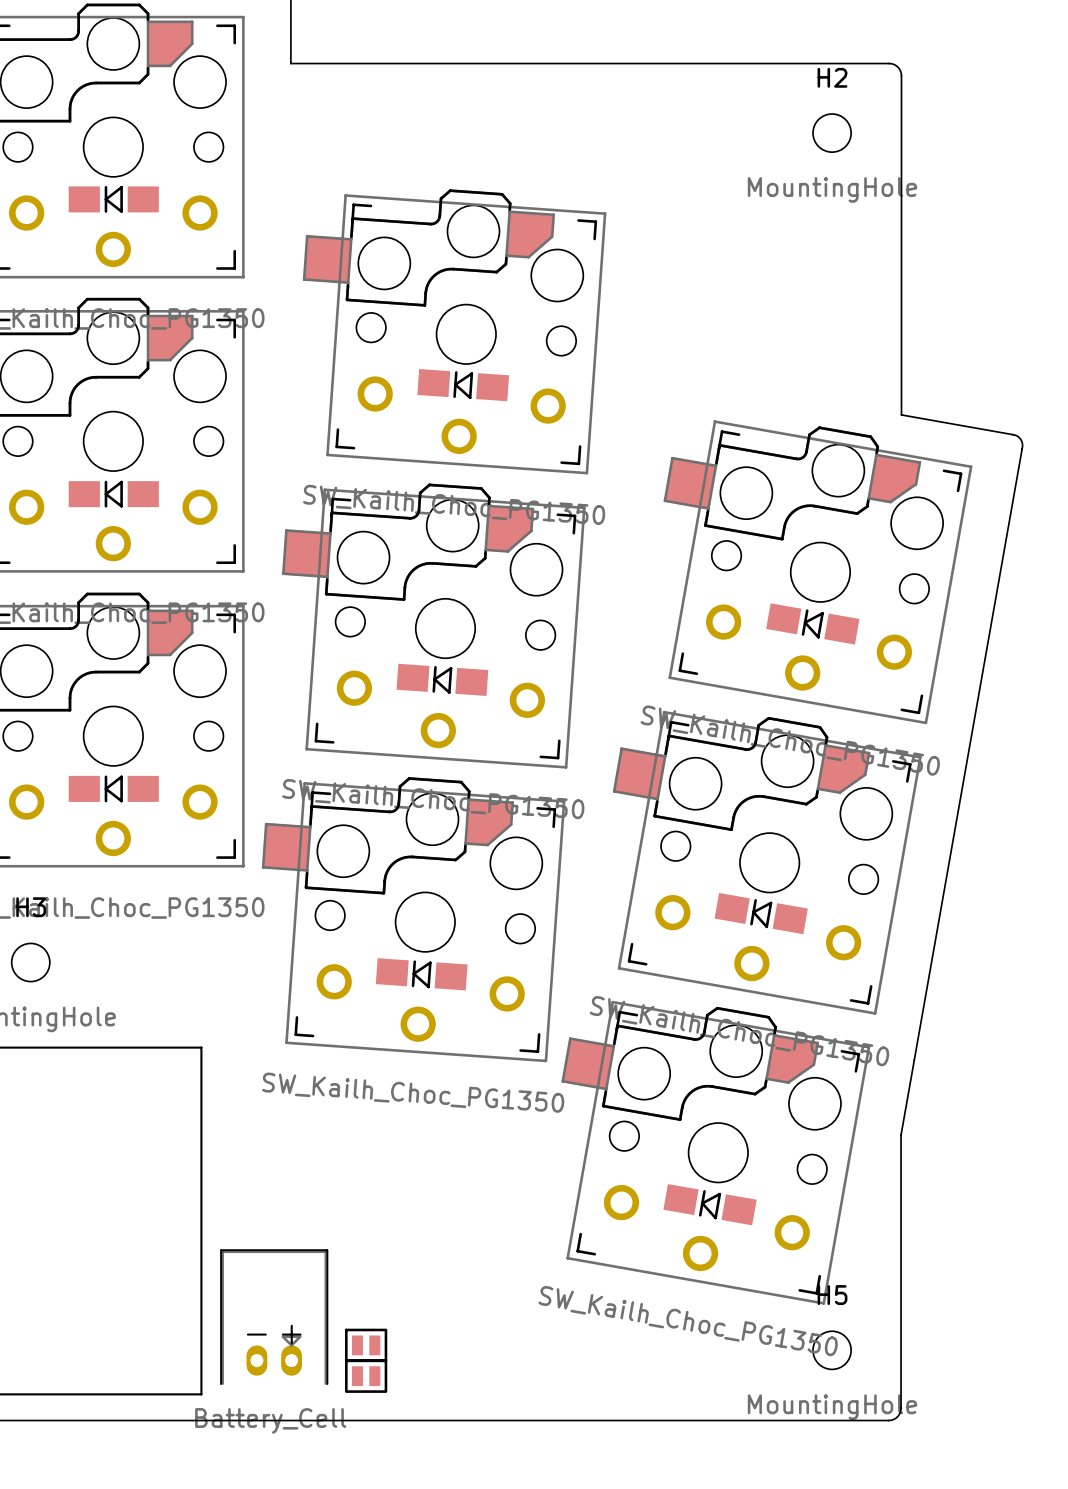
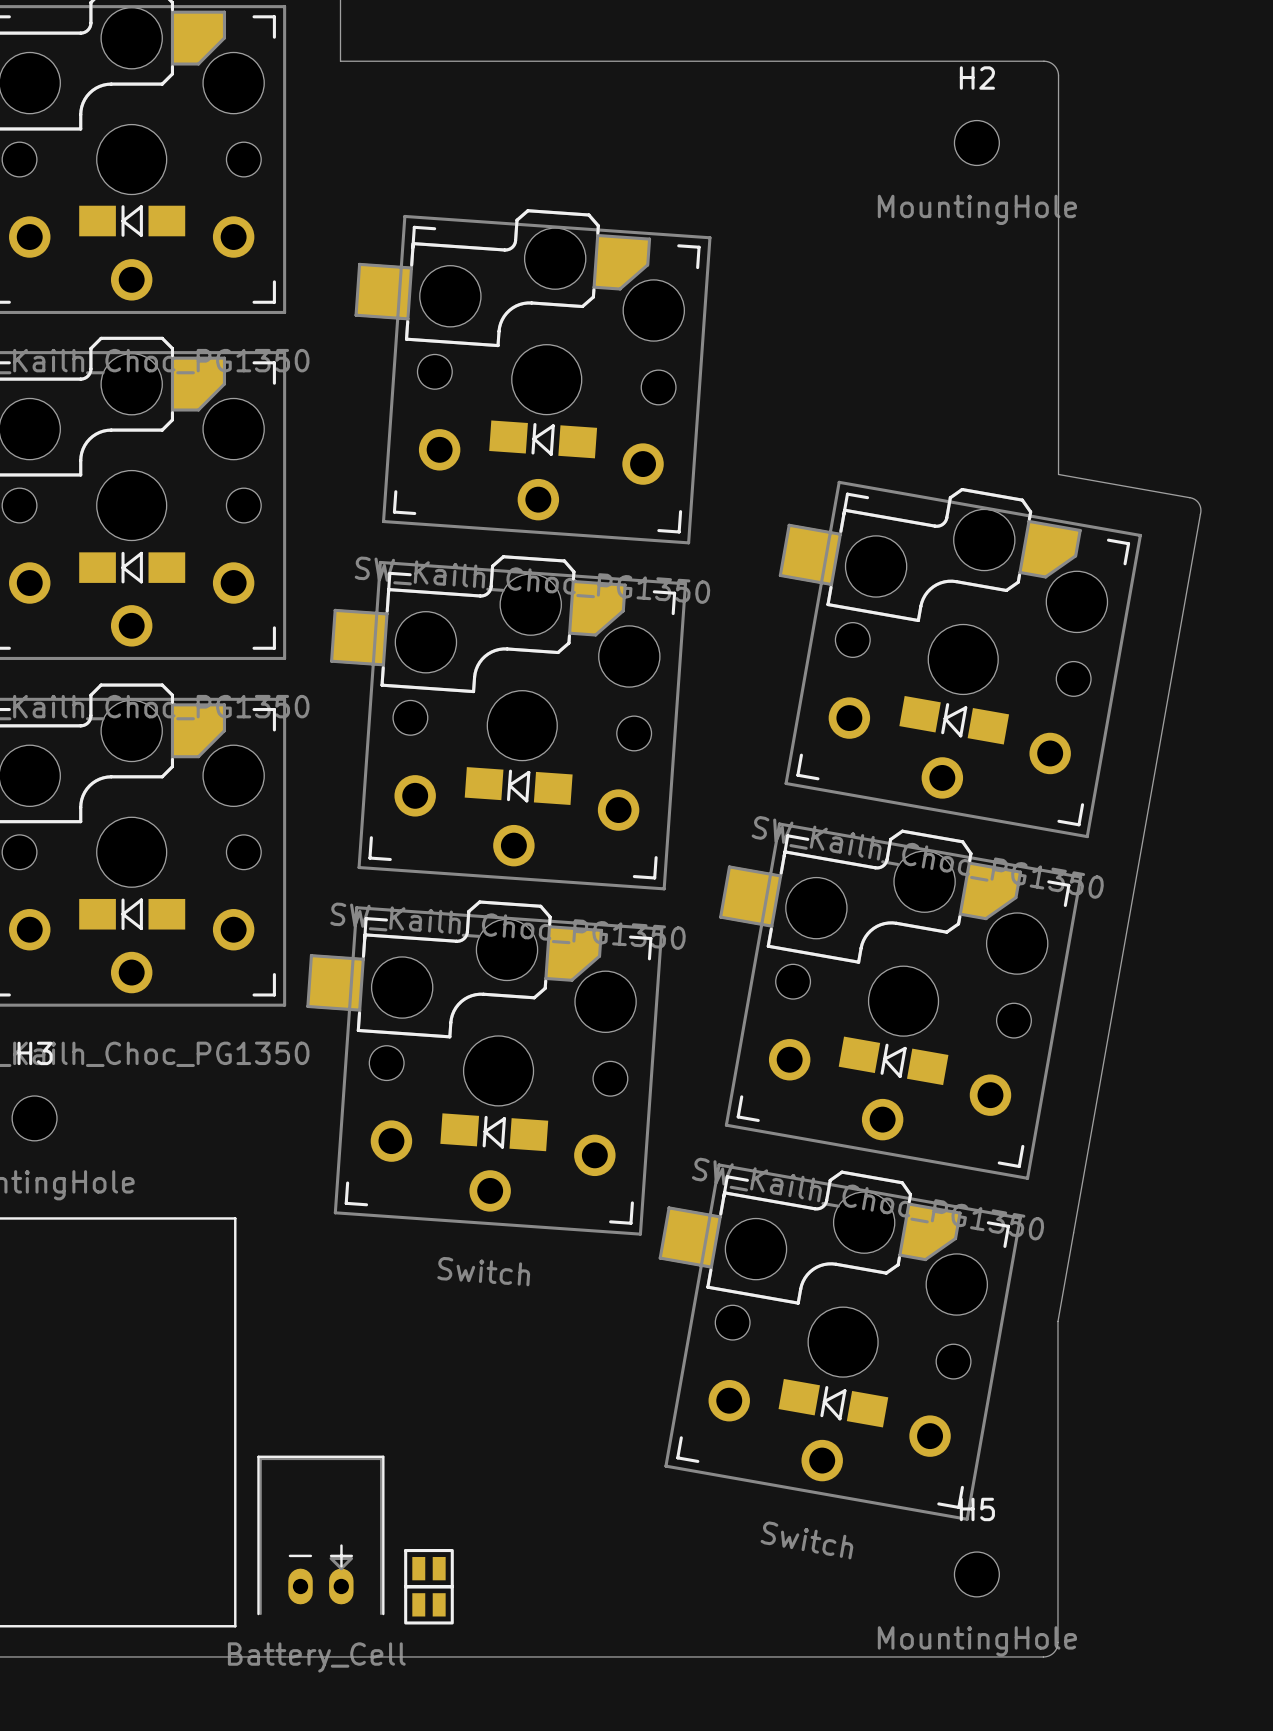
part value: SW_Kailh_Choc_PG1350 (413, 1092) -> Switch (483, 1271)
part value: SW_Kailh_Choc_PG1350 (688, 1321) -> Switch (806, 1540)

